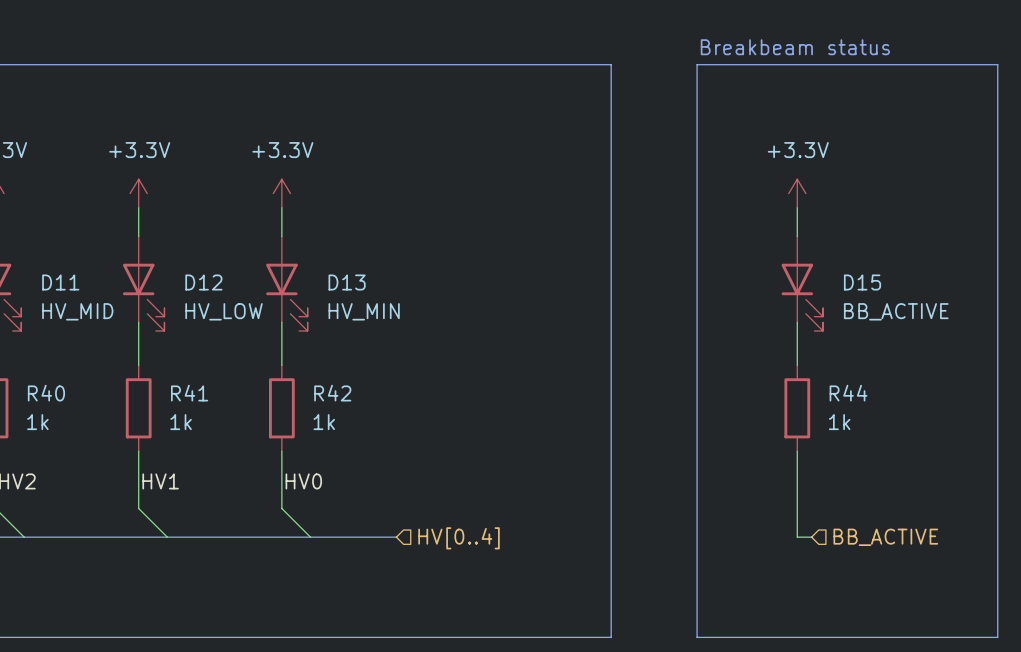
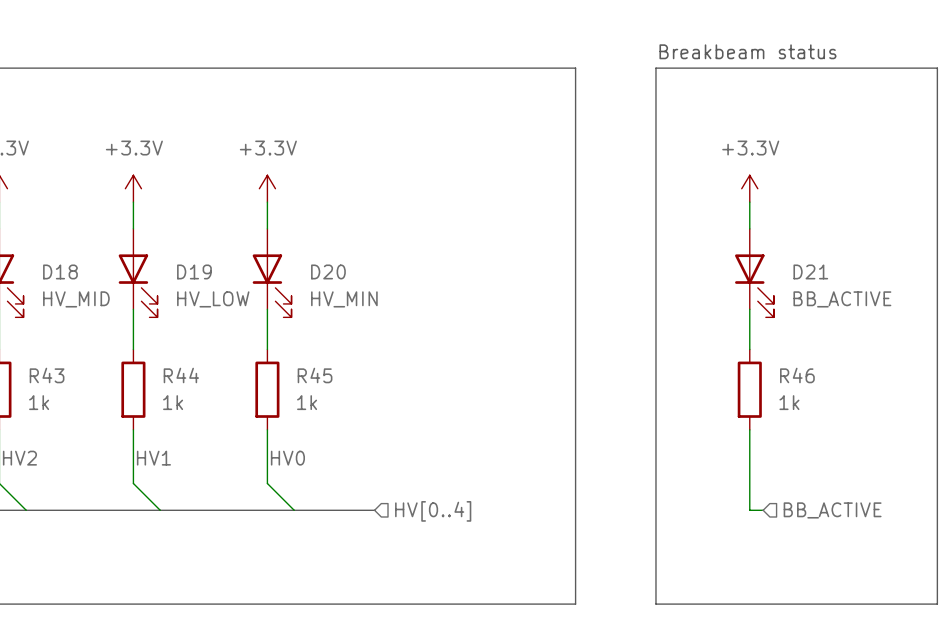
D11 name: D11 (60, 282) -> D18 (60, 271)
D12 name: D12 (203, 282) -> D19 (194, 271)
D13 name: D13 (347, 282) -> D20 (328, 271)
D15 name: D15 (862, 282) -> D21 (810, 271)
R40 name: R40 (46, 393) -> R43 (47, 375)
R41 name: R41 (189, 393) -> R44 (181, 375)
R42 name: R42 (332, 393) -> R45 (315, 375)
R44 name: R44 (848, 393) -> R46 (797, 375)

